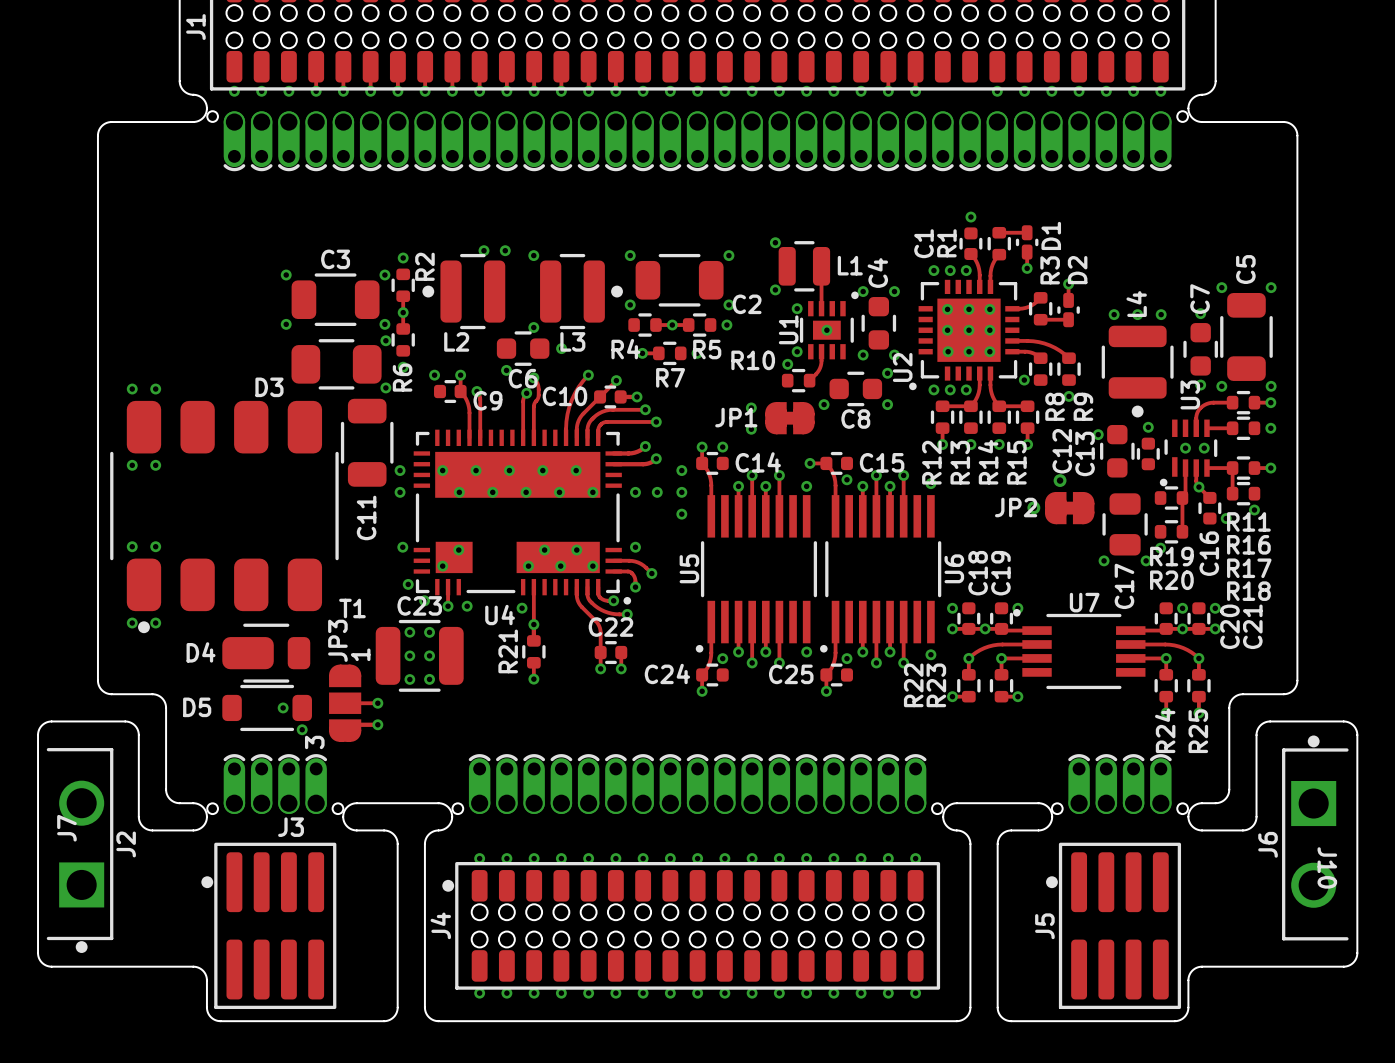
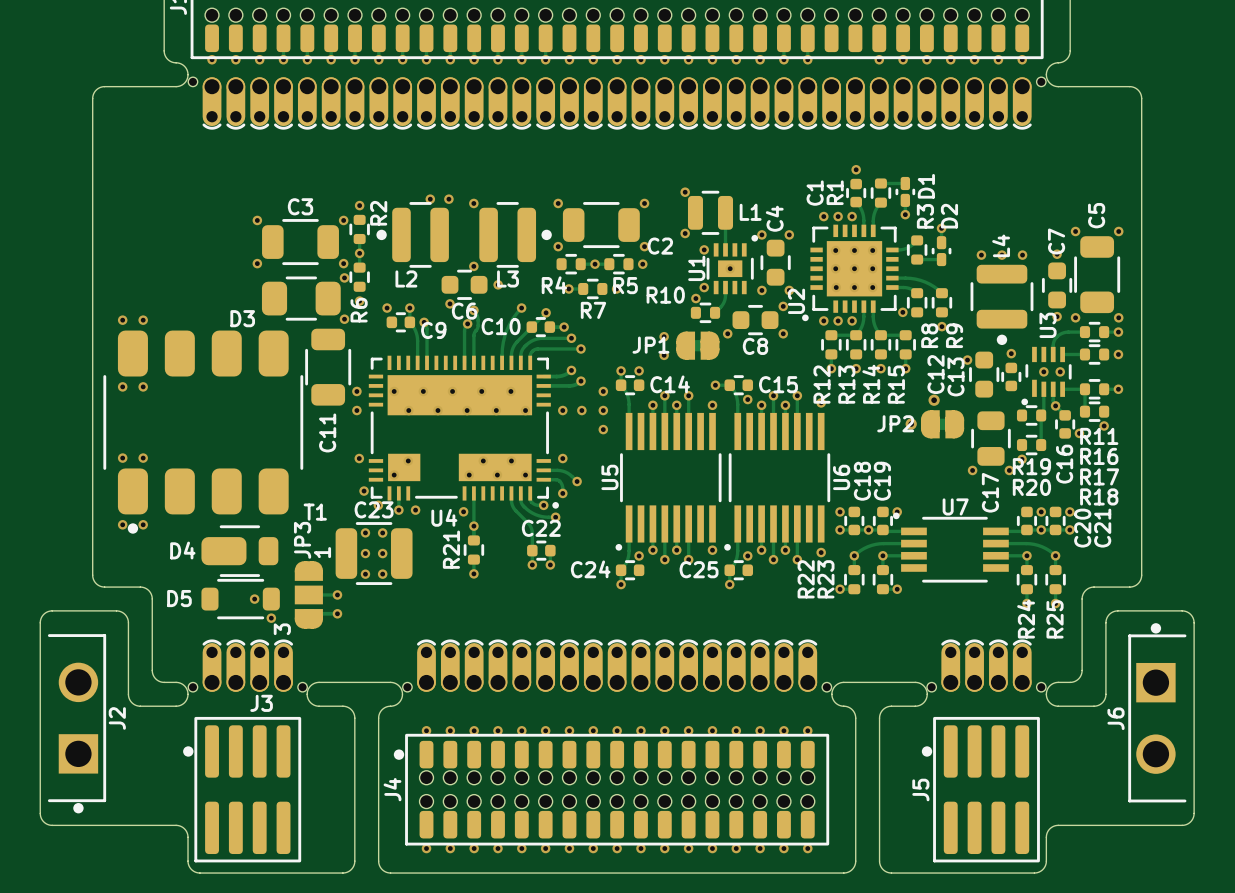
J7: (66, 828) -> none
J10: (1327, 867) -> none

